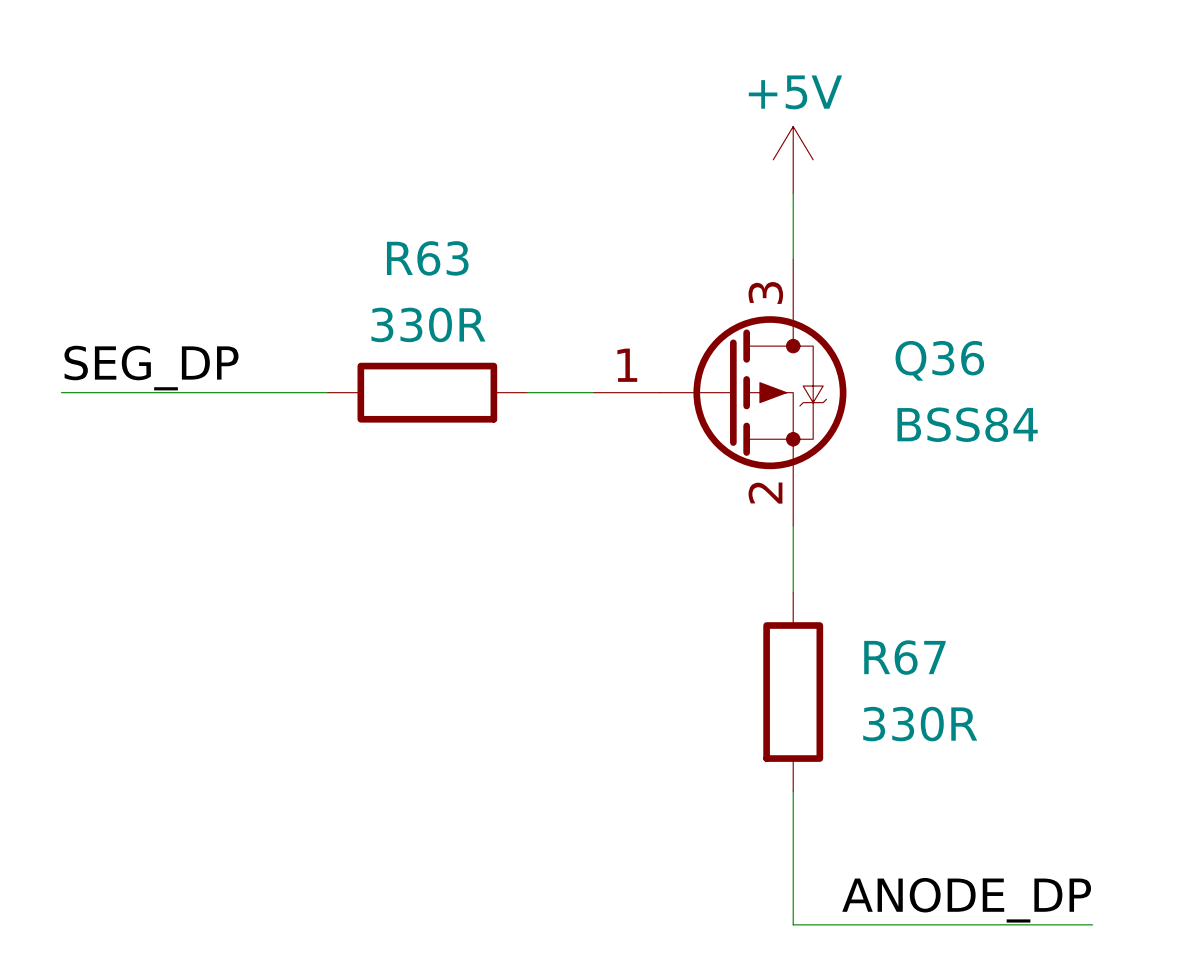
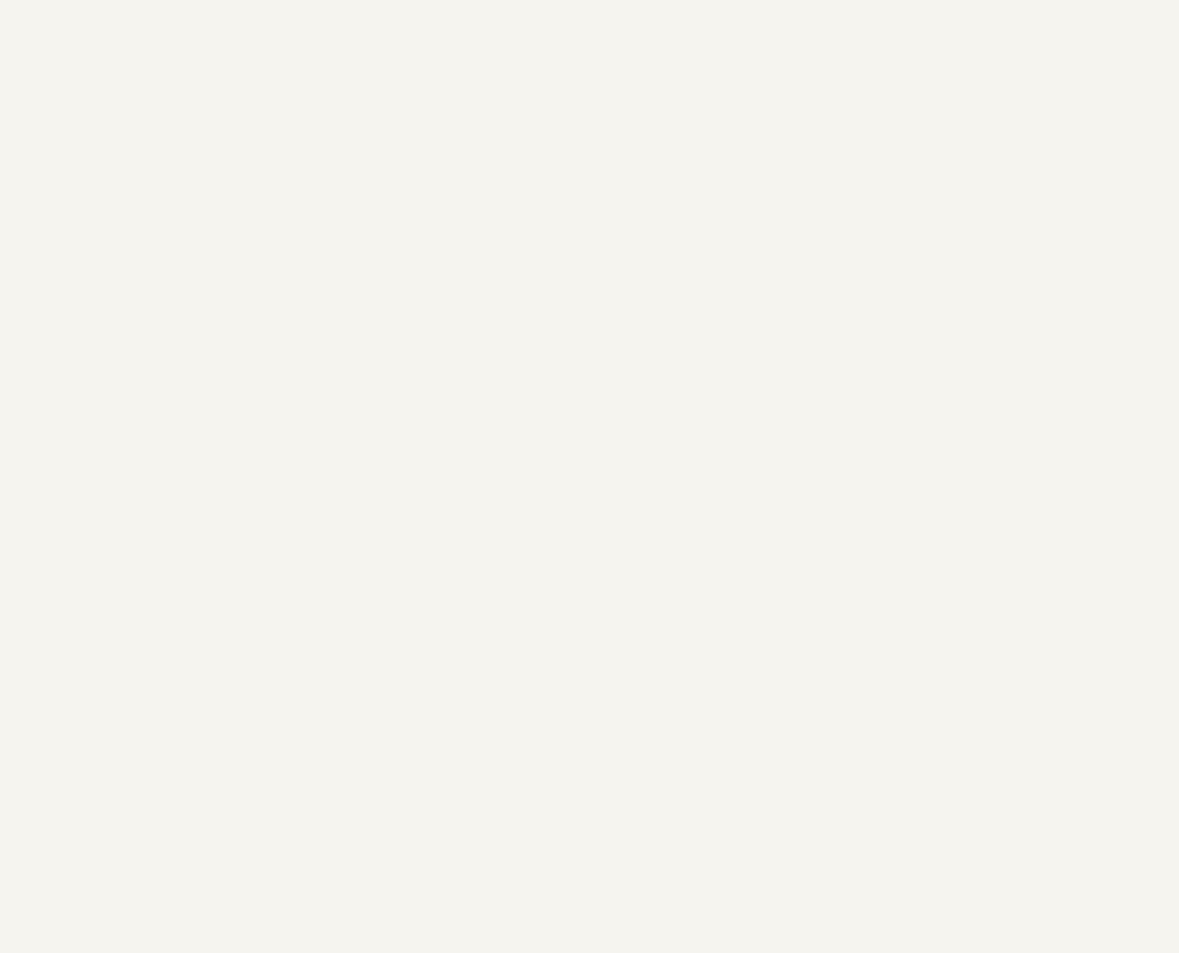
power symbol: +5V (793, 159) -> none
wire: (793, 193) (793, 259) -> none
label: SEG_DP (151, 368) -> none
wire: (61, 392) (327, 392) -> none
R63: 330R (427, 392) -> none
wire: (527, 392) (593, 392) -> none
Q36: BSS84 (720, 392) -> none
wire: (793, 525) (793, 592) -> none
R67: 330R (793, 692) -> none
wire: (793, 791) (793, 924) (1092, 924) -> none
label: ANODE_DP (966, 900) -> none

